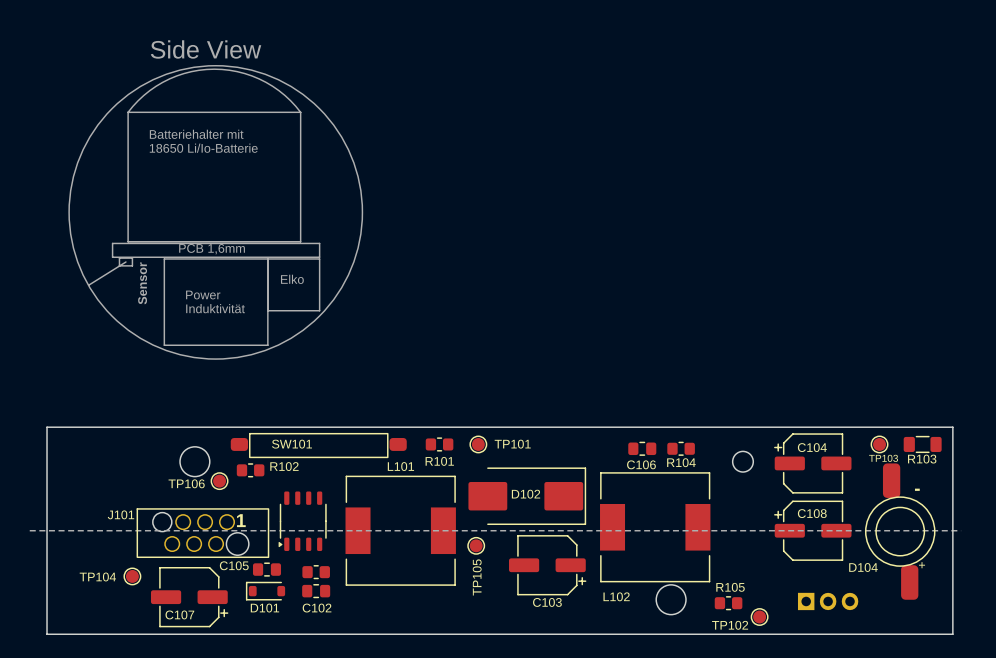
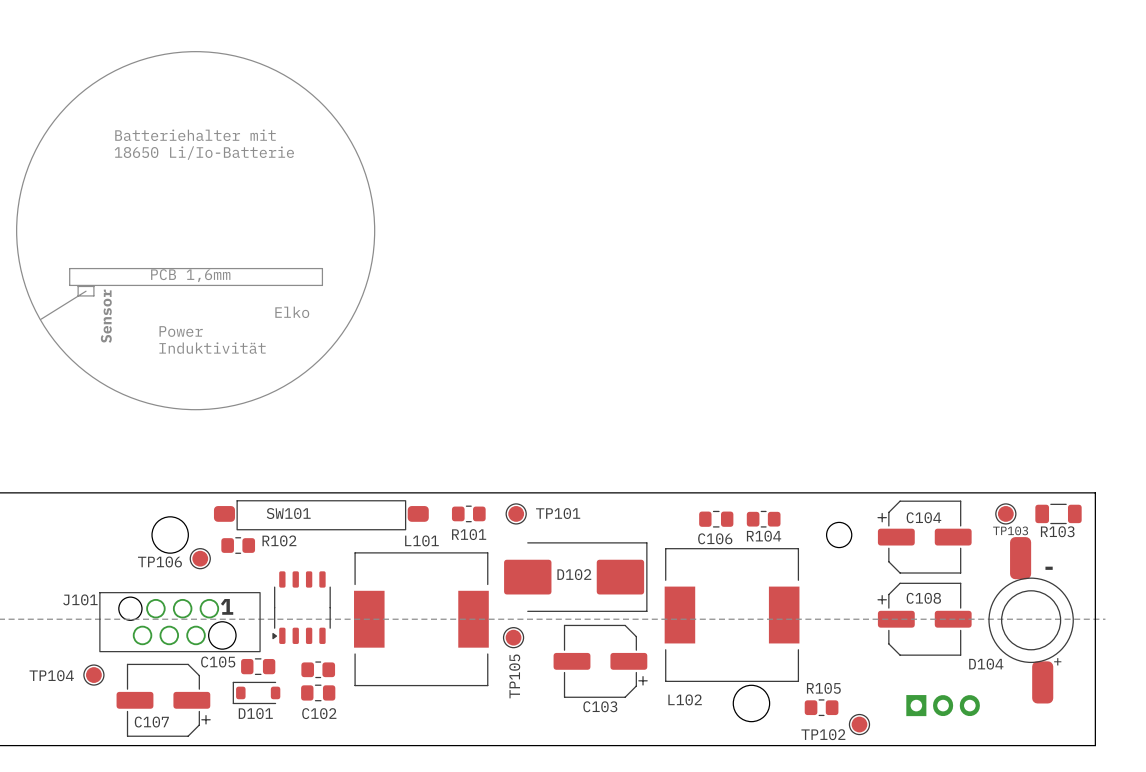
text: Side View (206, 49) -> none
line: (128, 112) (300, 112) -> none
line: (128, 112) (128, 241) (300, 241) (300, 112) -> none
line: (128, 112) (149, 90) (169, 78) (191, 71) (214, 69) (237, 71) (266, 82) (284, 95) (300, 112) -> none
line: (267, 258) (267, 345) (164, 345) (164, 258) (319, 258) (319, 310) (267, 310) -> none

